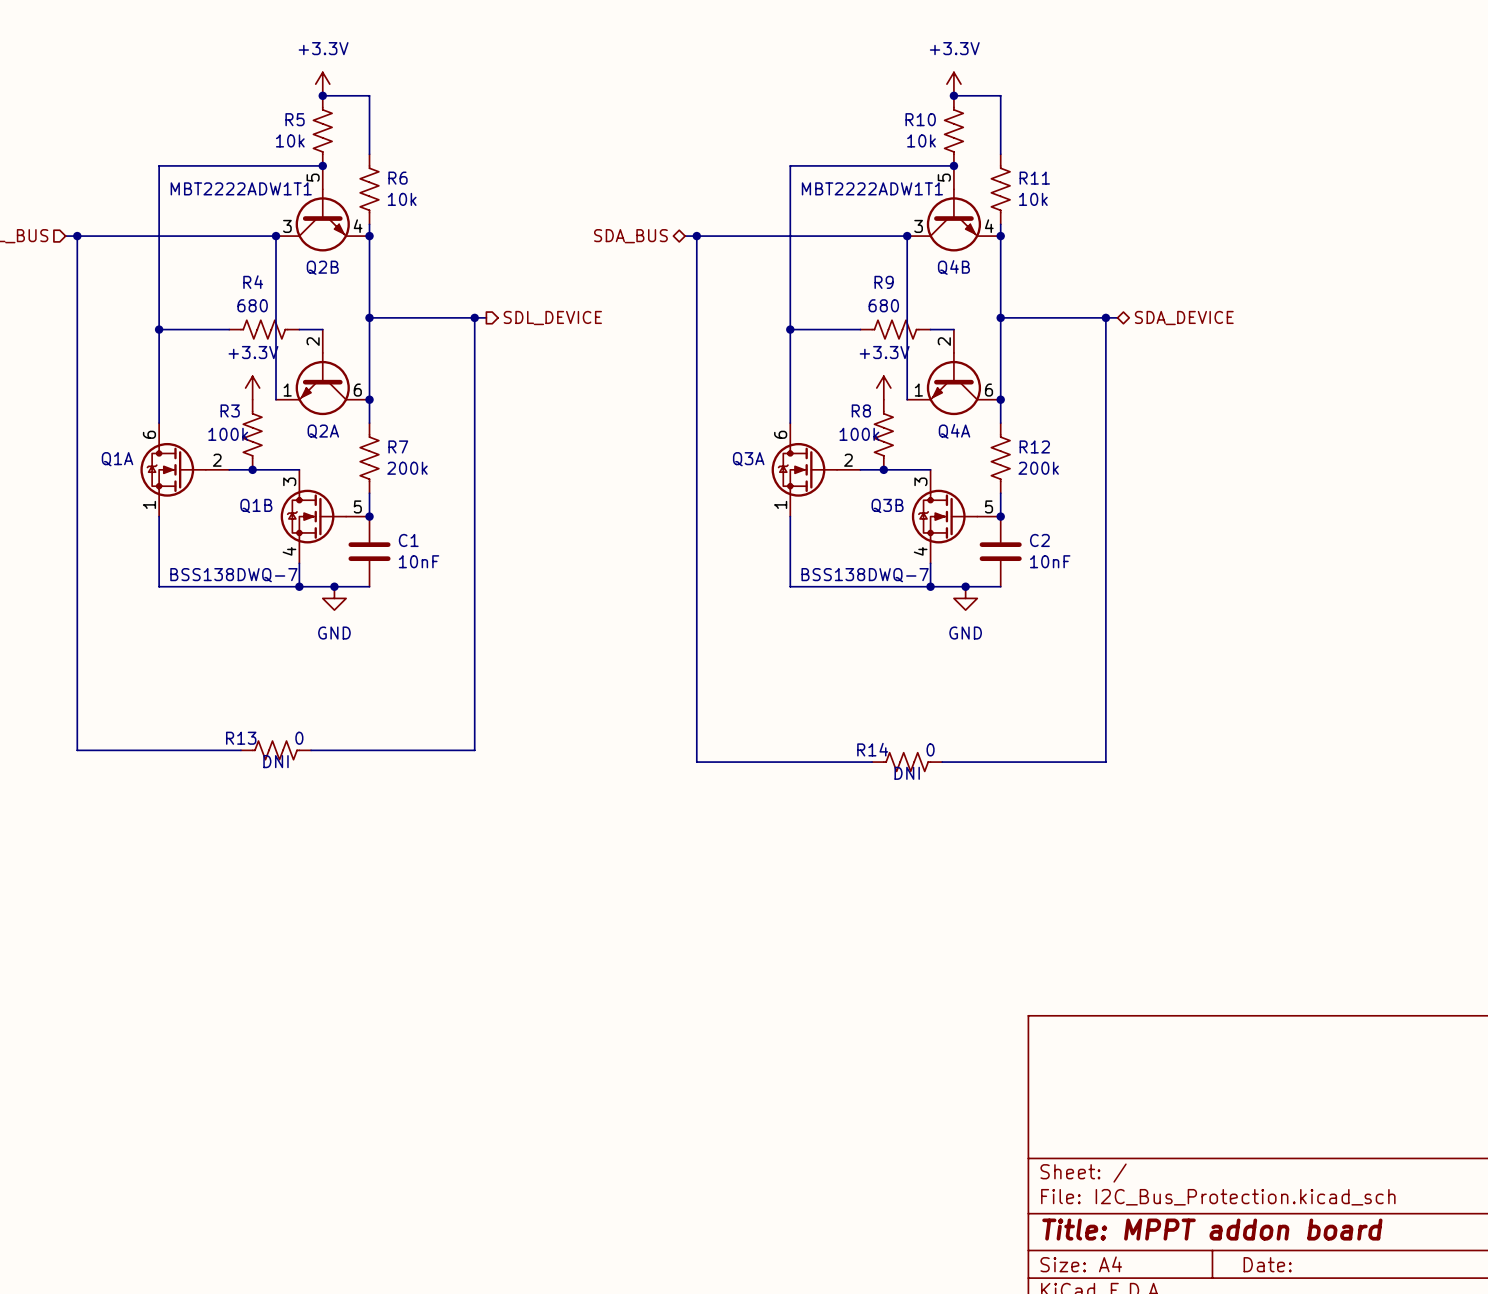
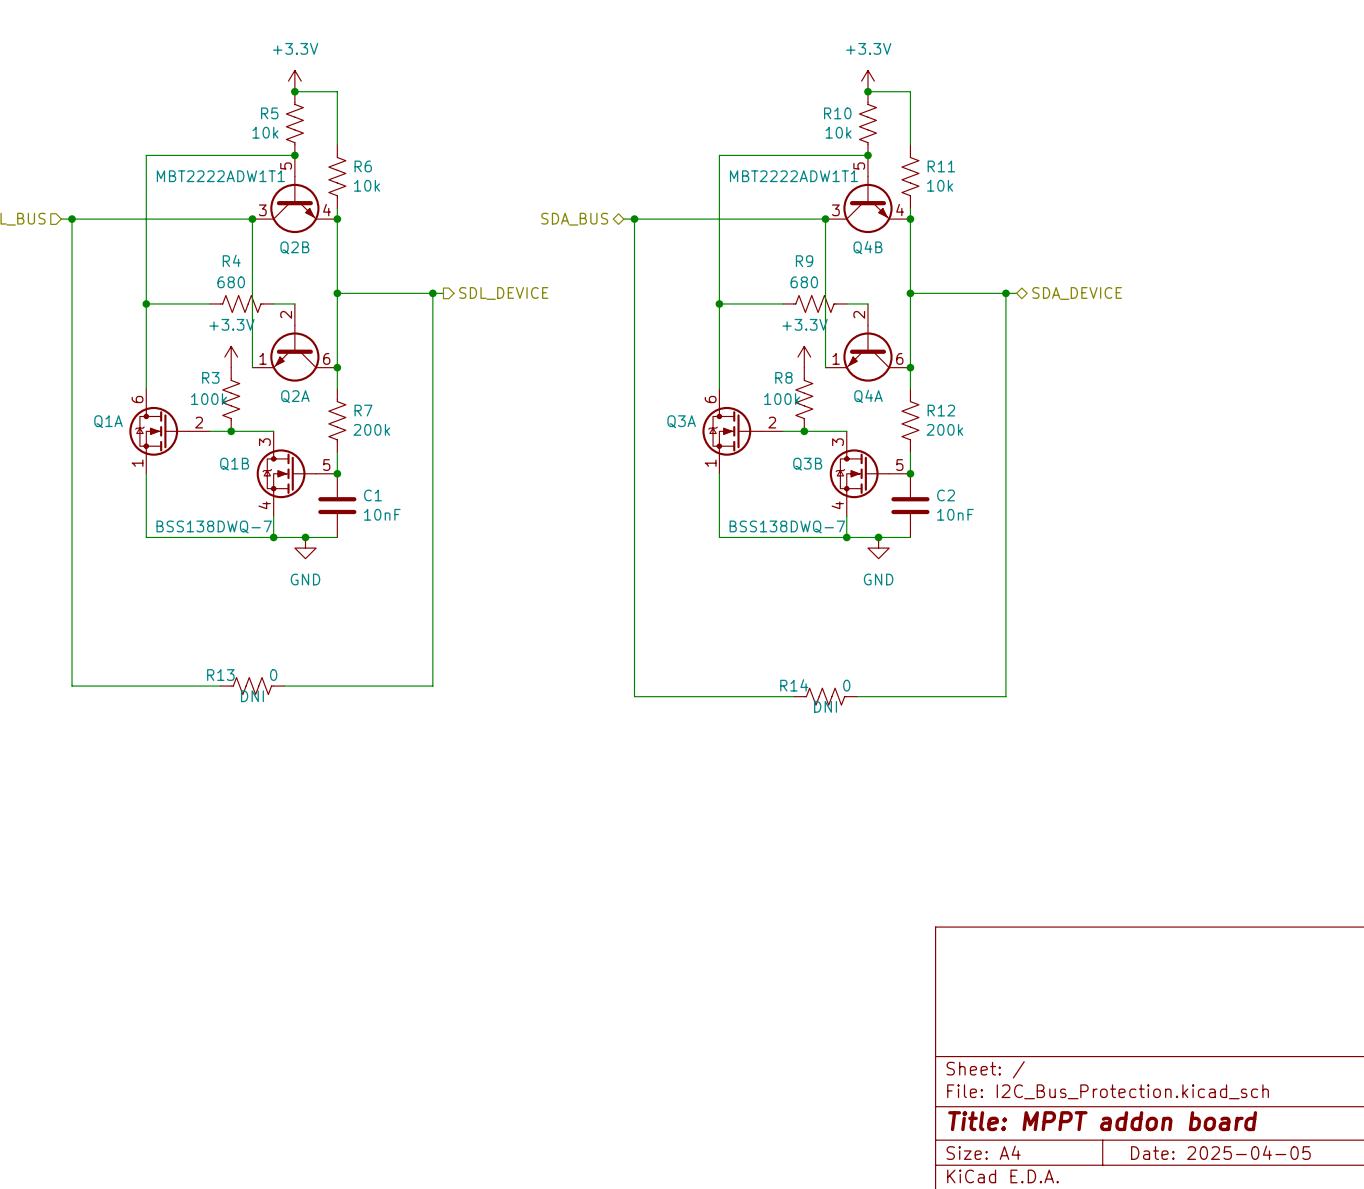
title block: Date: (1267, 1264) -> Date: 2025-04-05 (1220, 1152)

